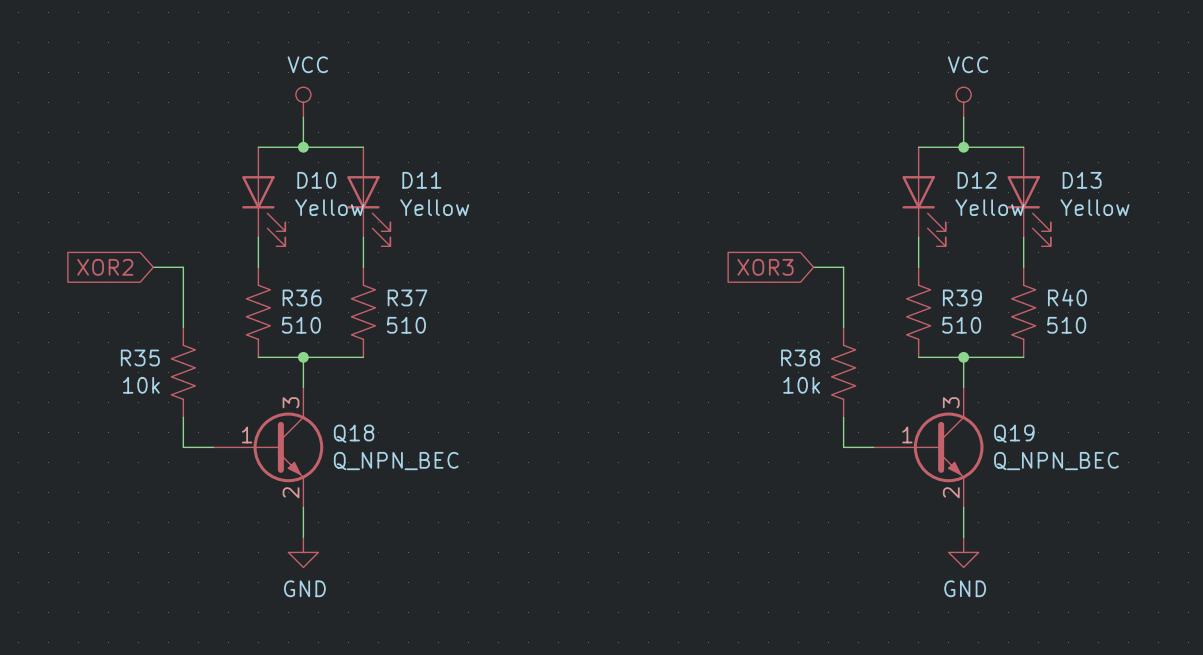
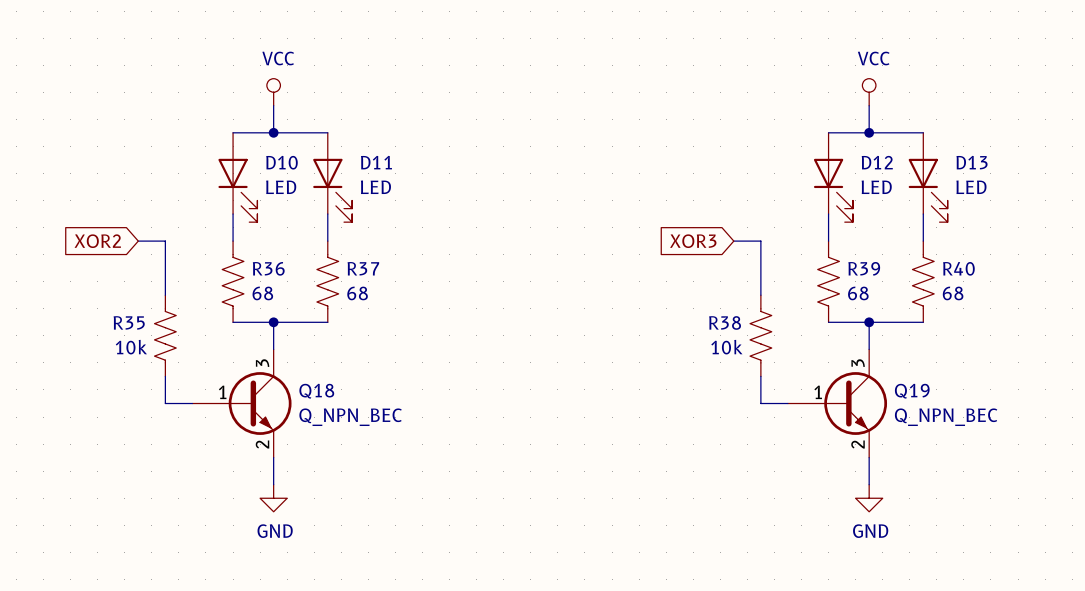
D10 value: Yellow (329, 207) -> LED (281, 187)
D11 value: Yellow (434, 207) -> LED (375, 187)
D12 value: Yellow (989, 207) -> LED (876, 187)
D13 value: Yellow (1094, 207) -> LED (971, 187)
R36 value: 510 (301, 325) -> 68 (262, 293)
R37 value: 510 (406, 325) -> 68 (357, 293)
R39 value: 510 (961, 325) -> 68 (858, 293)
R40 value: 510 (1066, 325) -> 68 (953, 293)

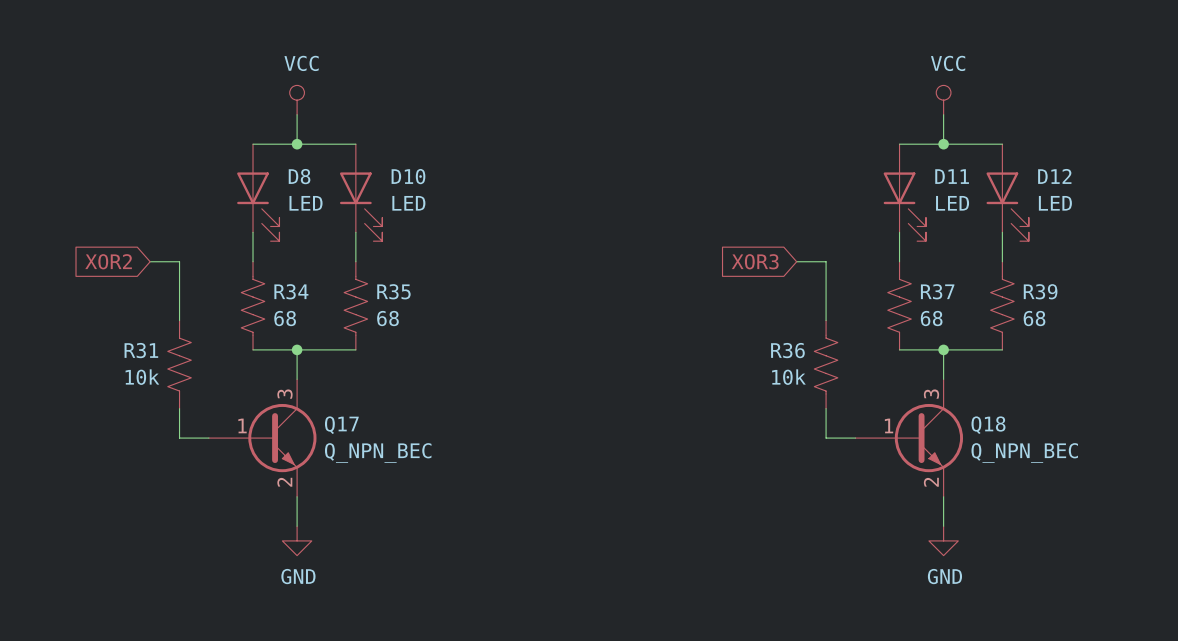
D10 name: D10 (281, 162) -> D8 (299, 176)
D11 name: D11 (376, 162) -> D10 (408, 176)
D12 name: D12 (877, 162) -> D11 (952, 176)
D13 name: D13 (972, 162) -> D12 (1054, 176)
R36 name: R36 (268, 268) -> R34 (291, 291)
R37 name: R37 (363, 268) -> R35 (393, 291)
R39 name: R39 (864, 268) -> R37 (937, 291)
R40 name: R40 (958, 268) -> R39 (1040, 291)
R35 name: R35 (129, 322) -> R31 (141, 350)
R38 name: R38 (725, 322) -> R36 (787, 350)
Q18 name: Q18 (316, 391) -> Q17 (341, 425)
Q19 name: Q19 (912, 391) -> Q18 (988, 425)

